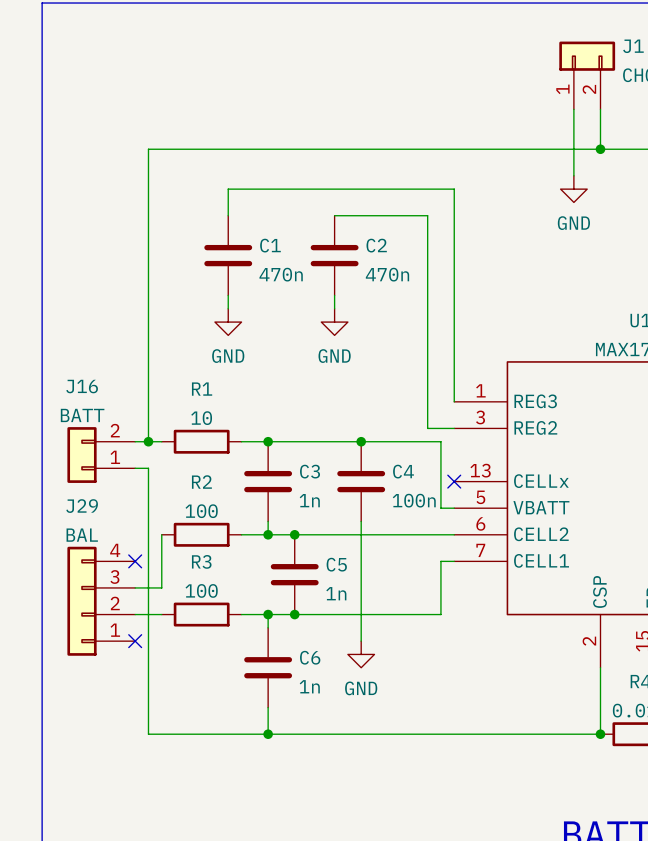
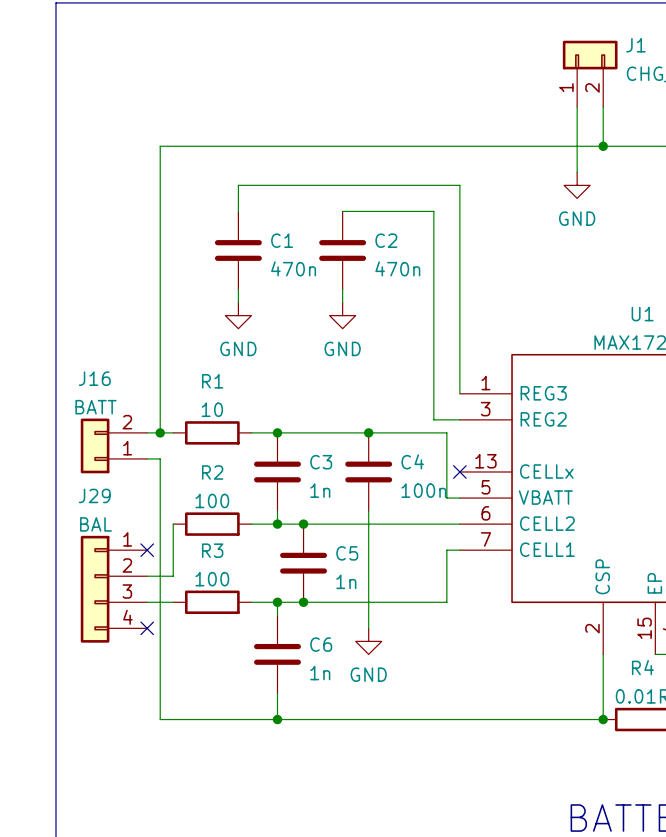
J29 flip: as is (82, 601) -> up-down (95, 589)

